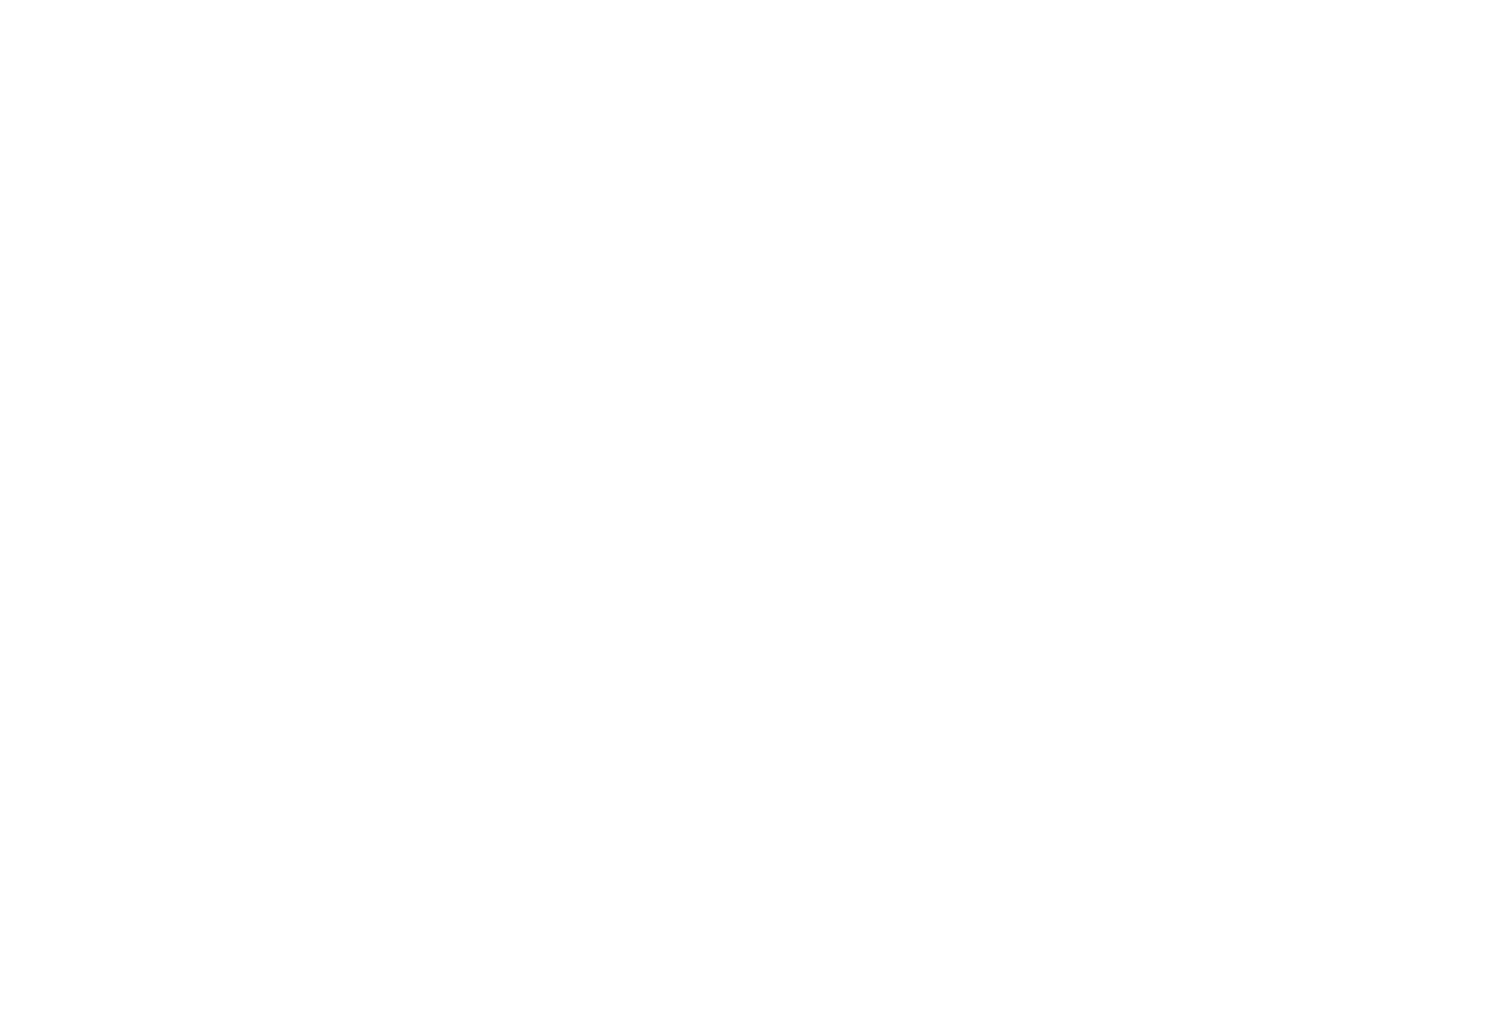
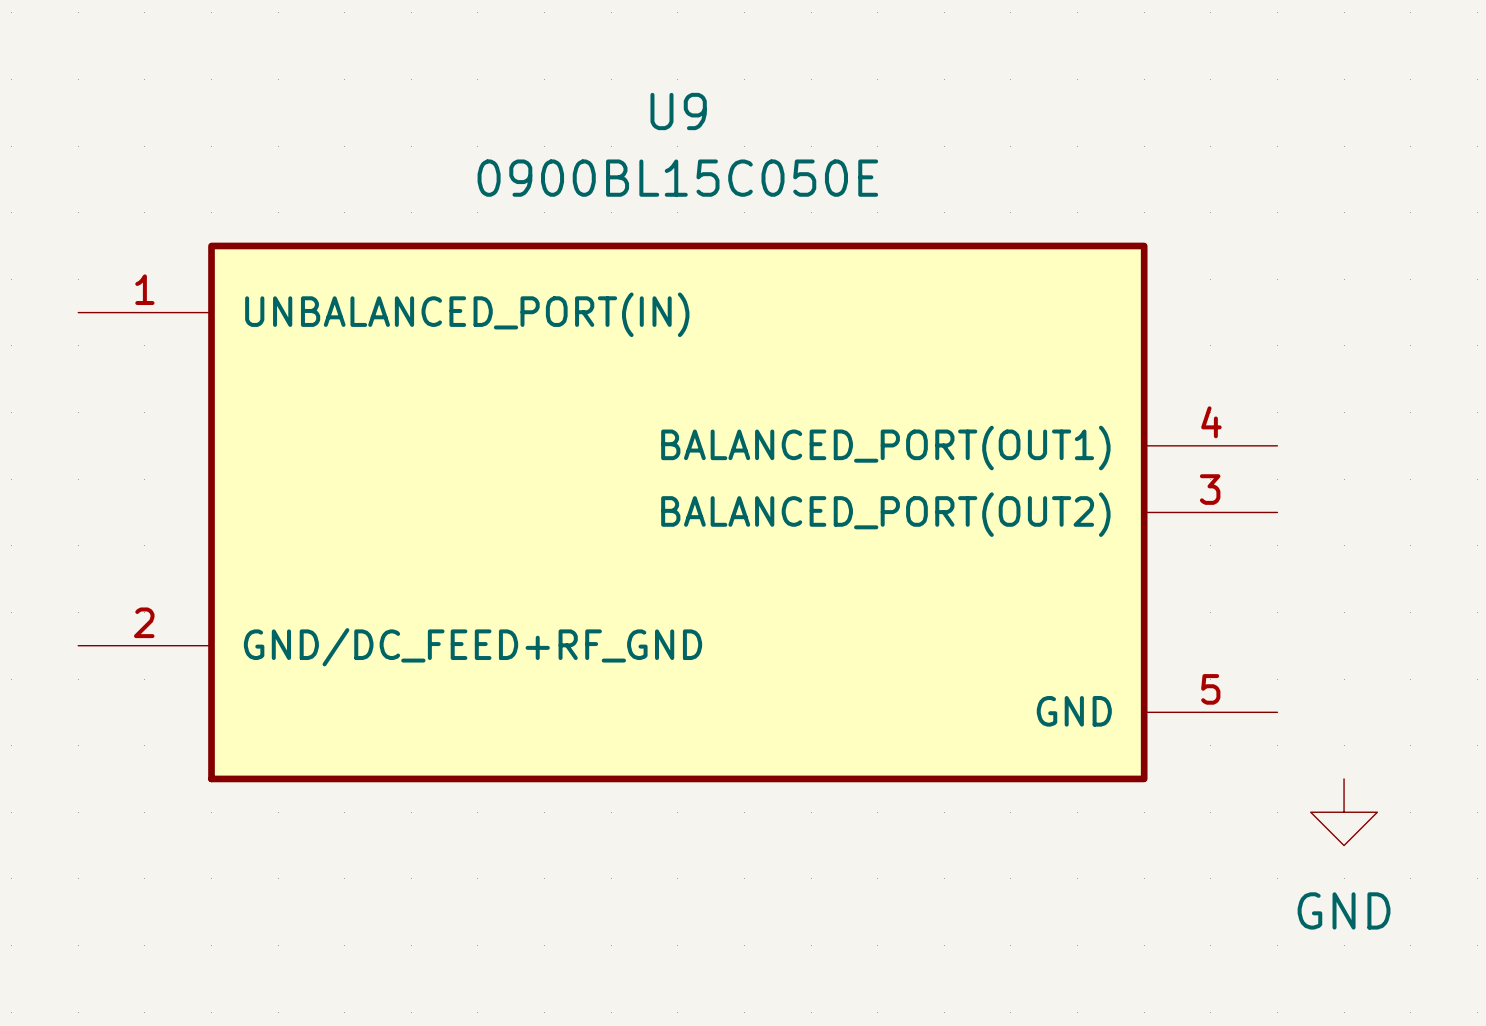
U9: none -> 0900BL15C050E (677, 512)
power symbol: none -> GND (1344, 812)

